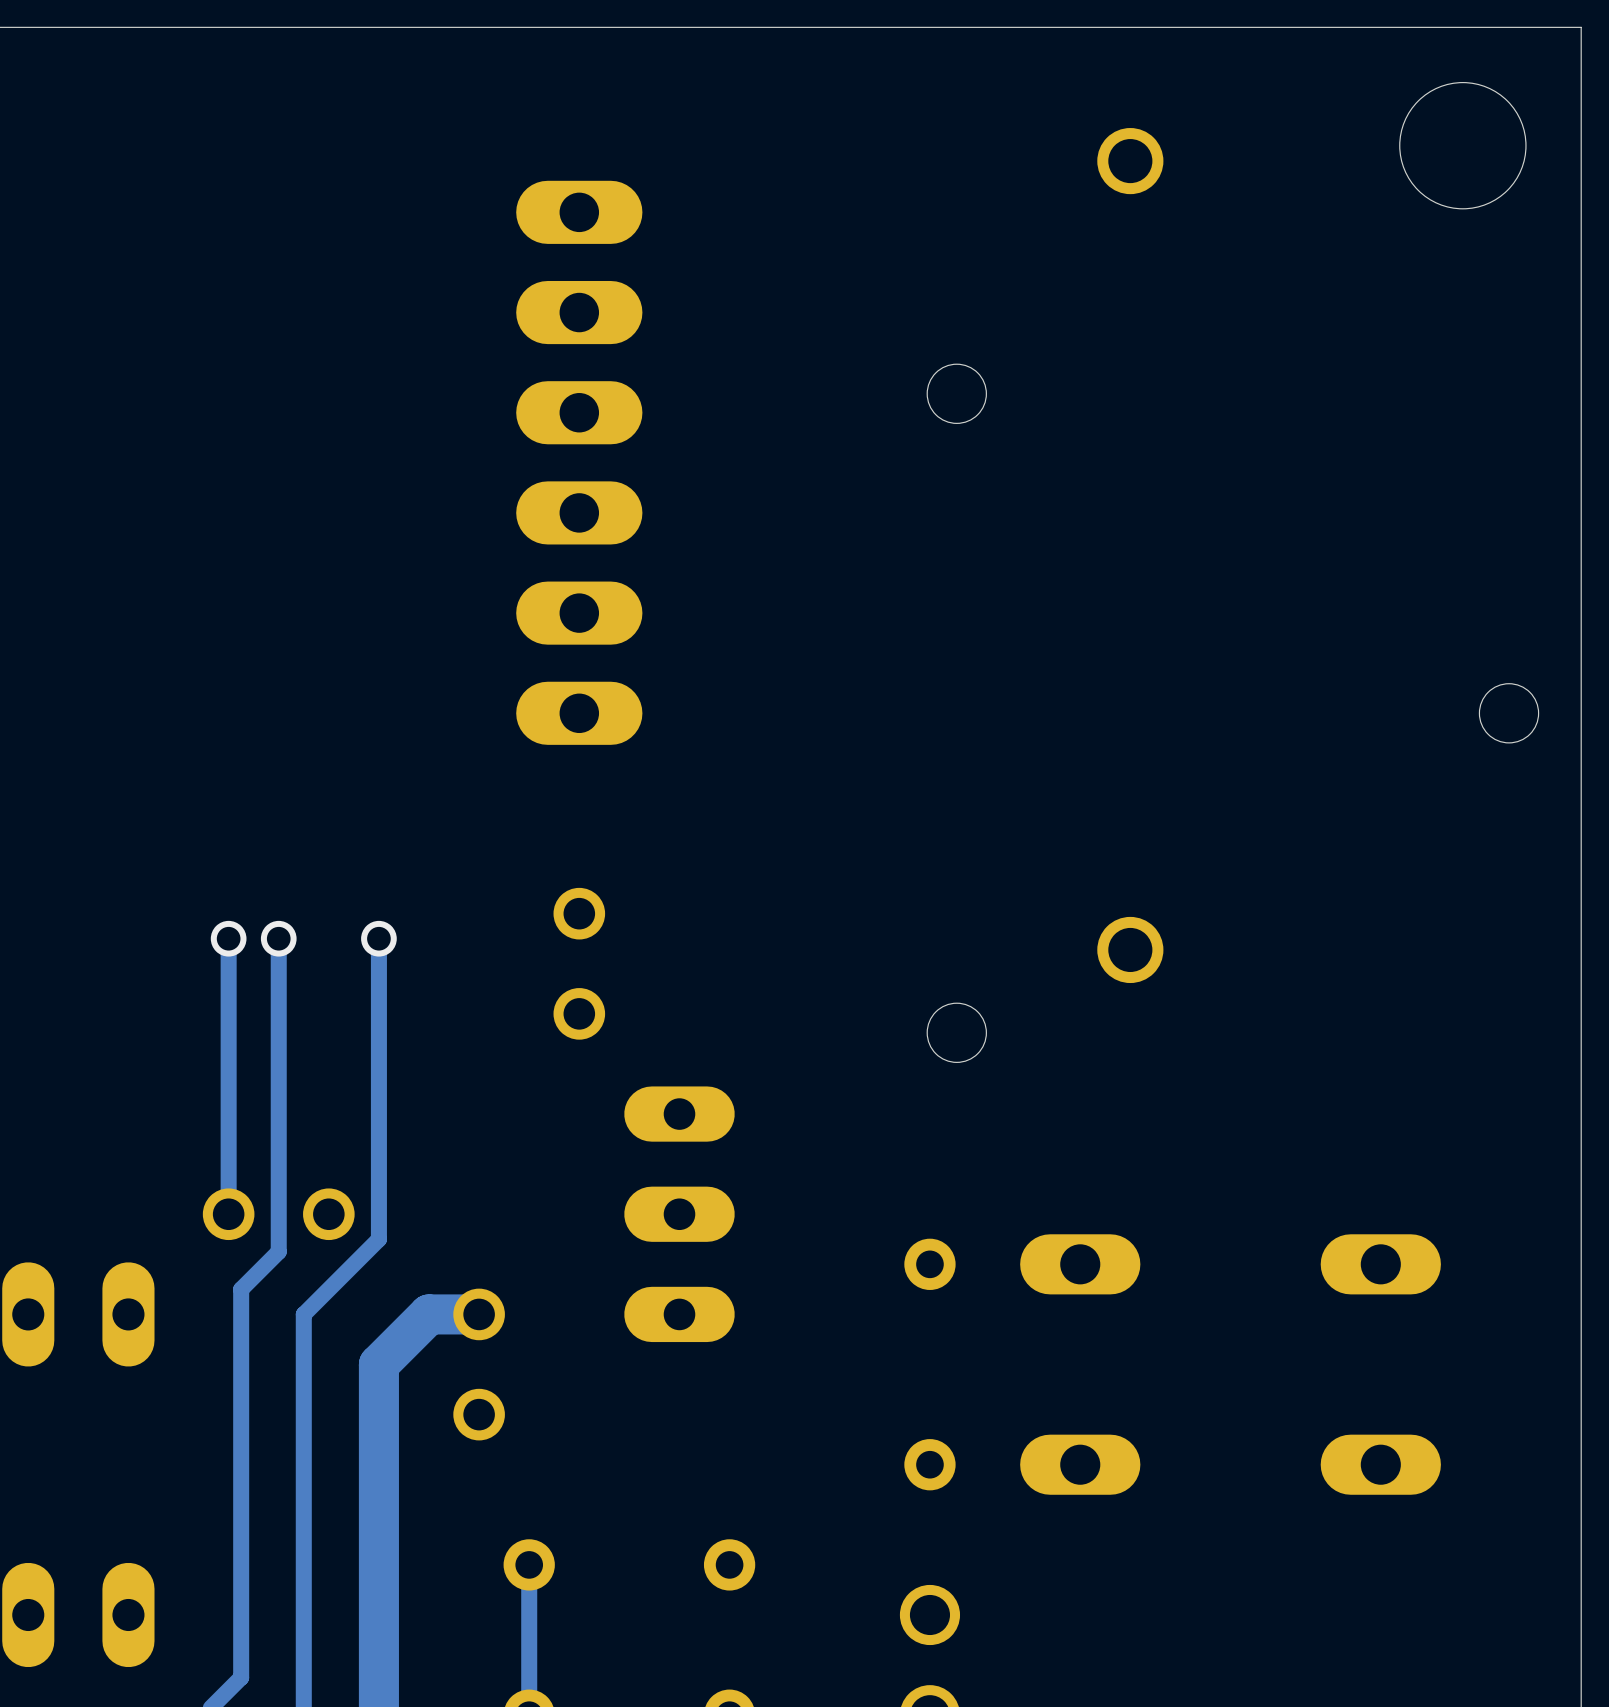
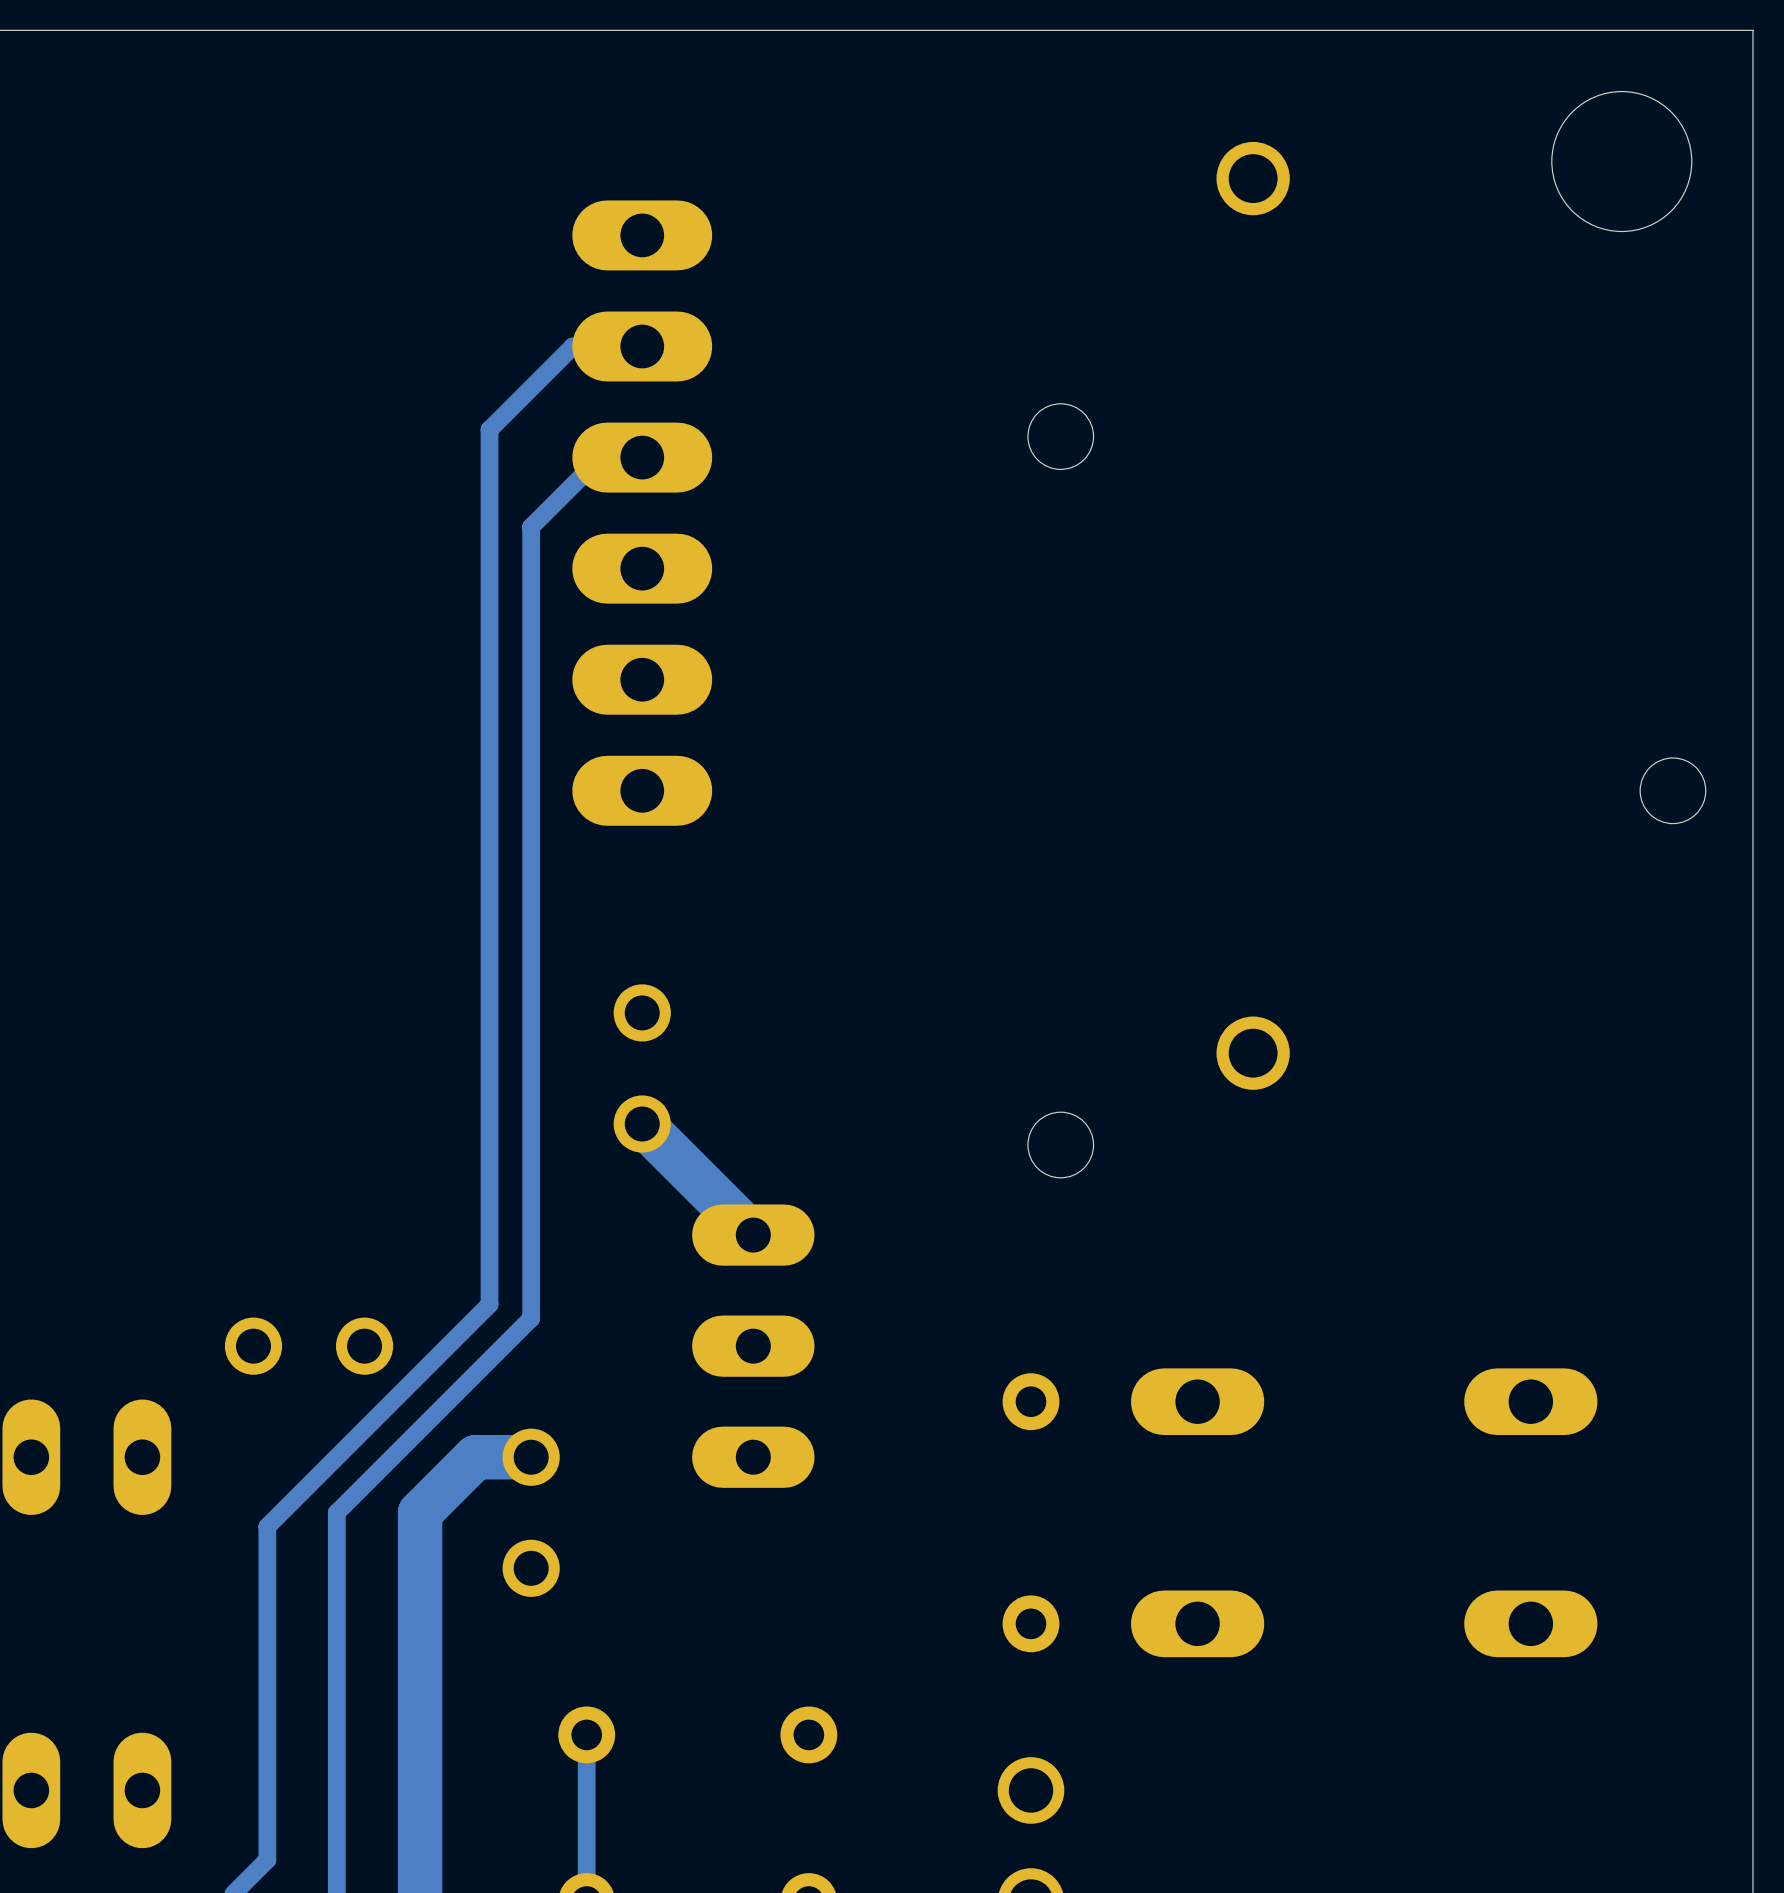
track: none -> (642, 457) (600, 457) (531, 526) (531, 1318) (336, 1512)
track: (228, 938) (228, 1214) -> none
via: (228, 938) -> none
track: (278, 938) (278, 1251) (241, 1289) (241, 1377) -> none
via: (278, 938) -> none
track: (378, 938) (378, 1239) -> (642, 346) (572, 346) (489, 429) (489, 1304) (420, 1373)
via: (378, 938) -> none
track: none -> (642, 1124) (753, 1235)
track: (303, 1314) (303, 1364) -> (336, 1457) (267, 1526)

